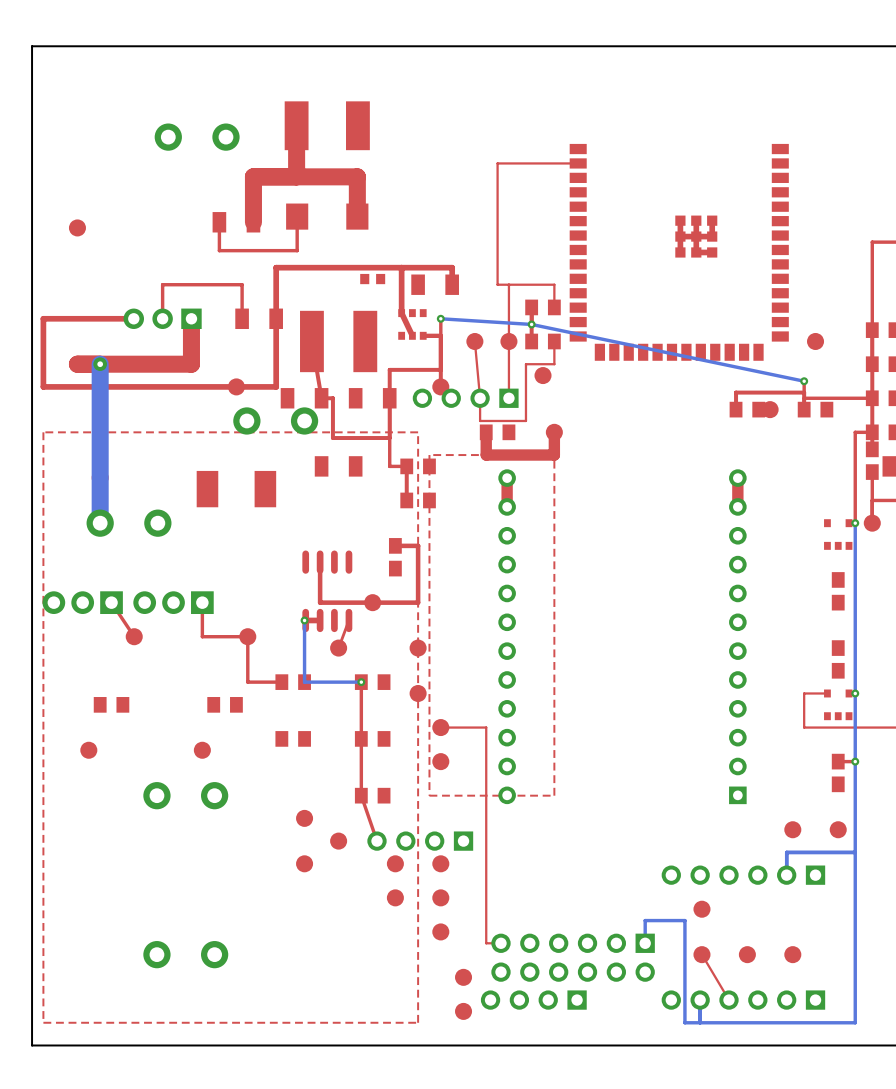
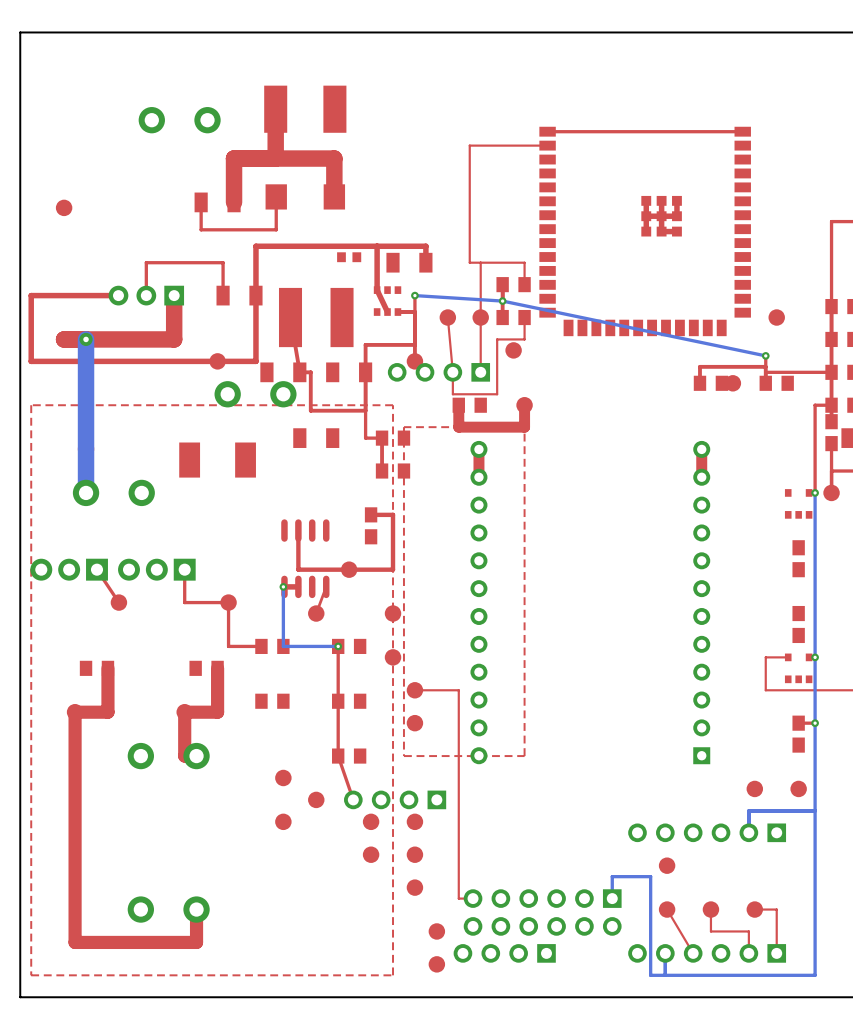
top track: none -> (742, 131) (547, 131)
top track: none -> (107, 668) (107, 712) (75, 712) (75, 942) (196, 942) (196, 909)
top track: none -> (217, 668) (217, 712) (184, 712) (184, 756) (196, 756)
top track: none -> (710, 909) (710, 931) (748, 931) (748, 953)
top track: none -> (754, 909) (776, 909) (776, 953)

